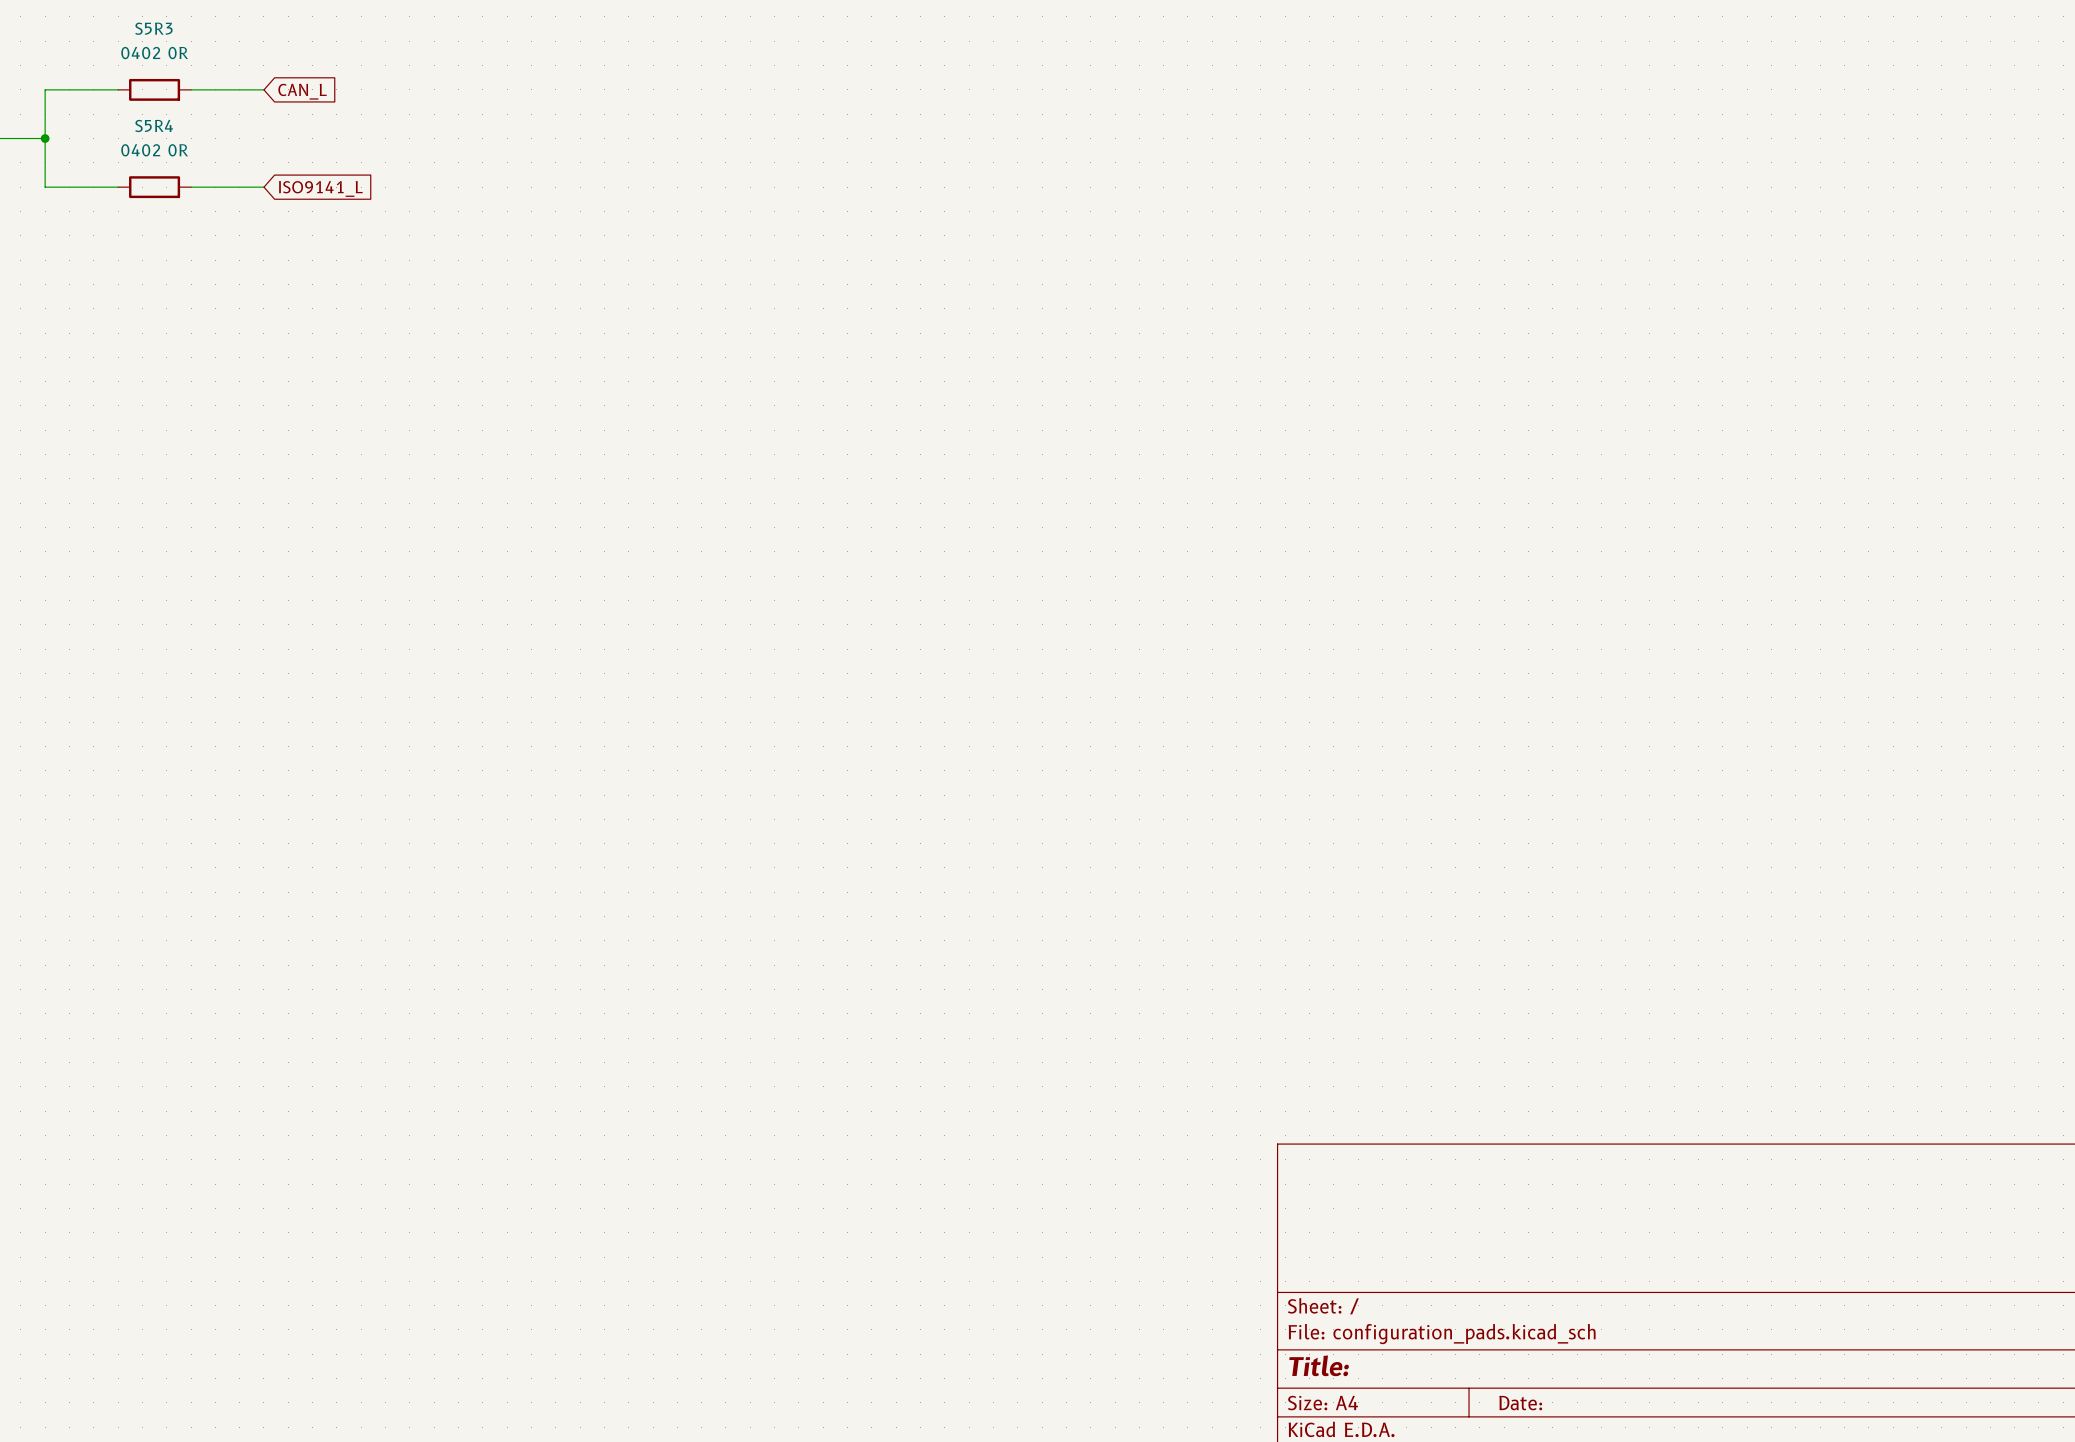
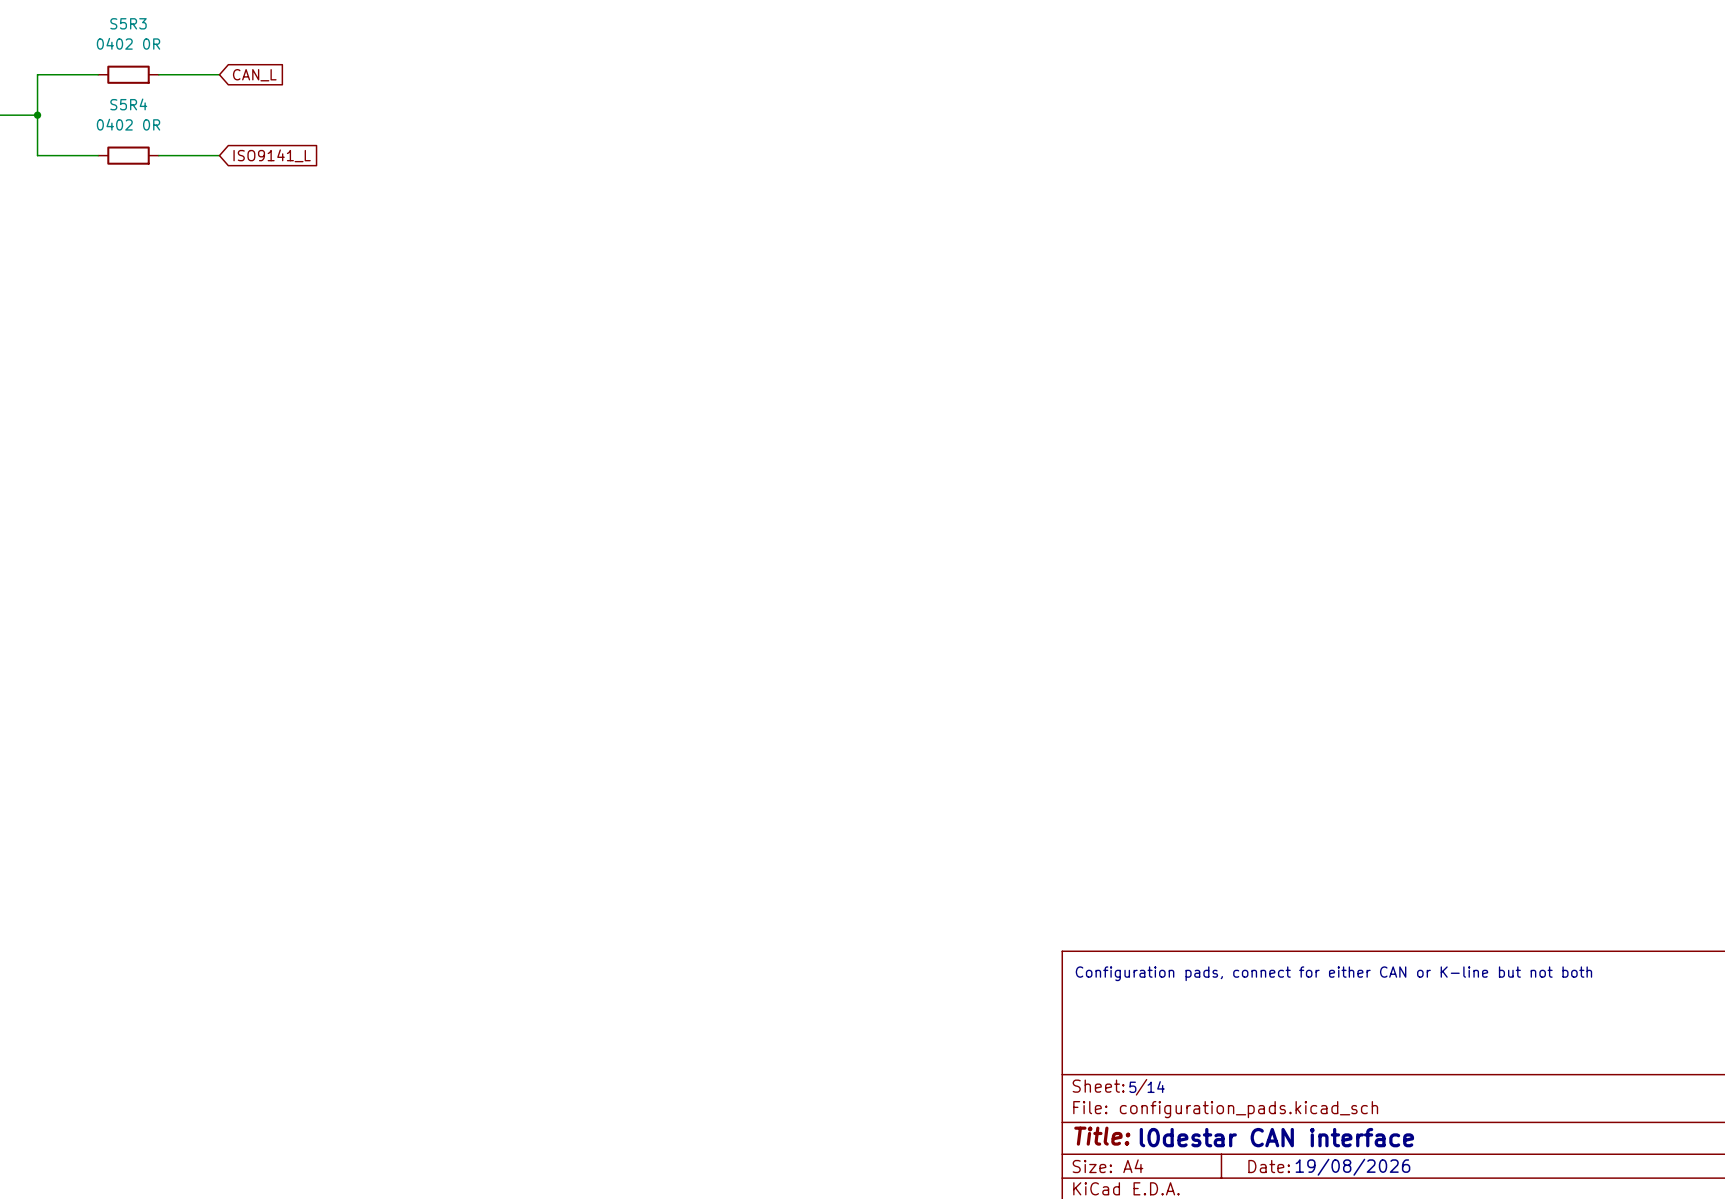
text: none -> Configuration pads, connect for either CAN or K-line but not both (1333, 973)
text: none -> 5 (1132, 1087)
text: none -> 14 (1156, 1087)
text: none -> l0destar CAN interface (1276, 1137)
text: none -> 19/08/2026 (1352, 1167)

